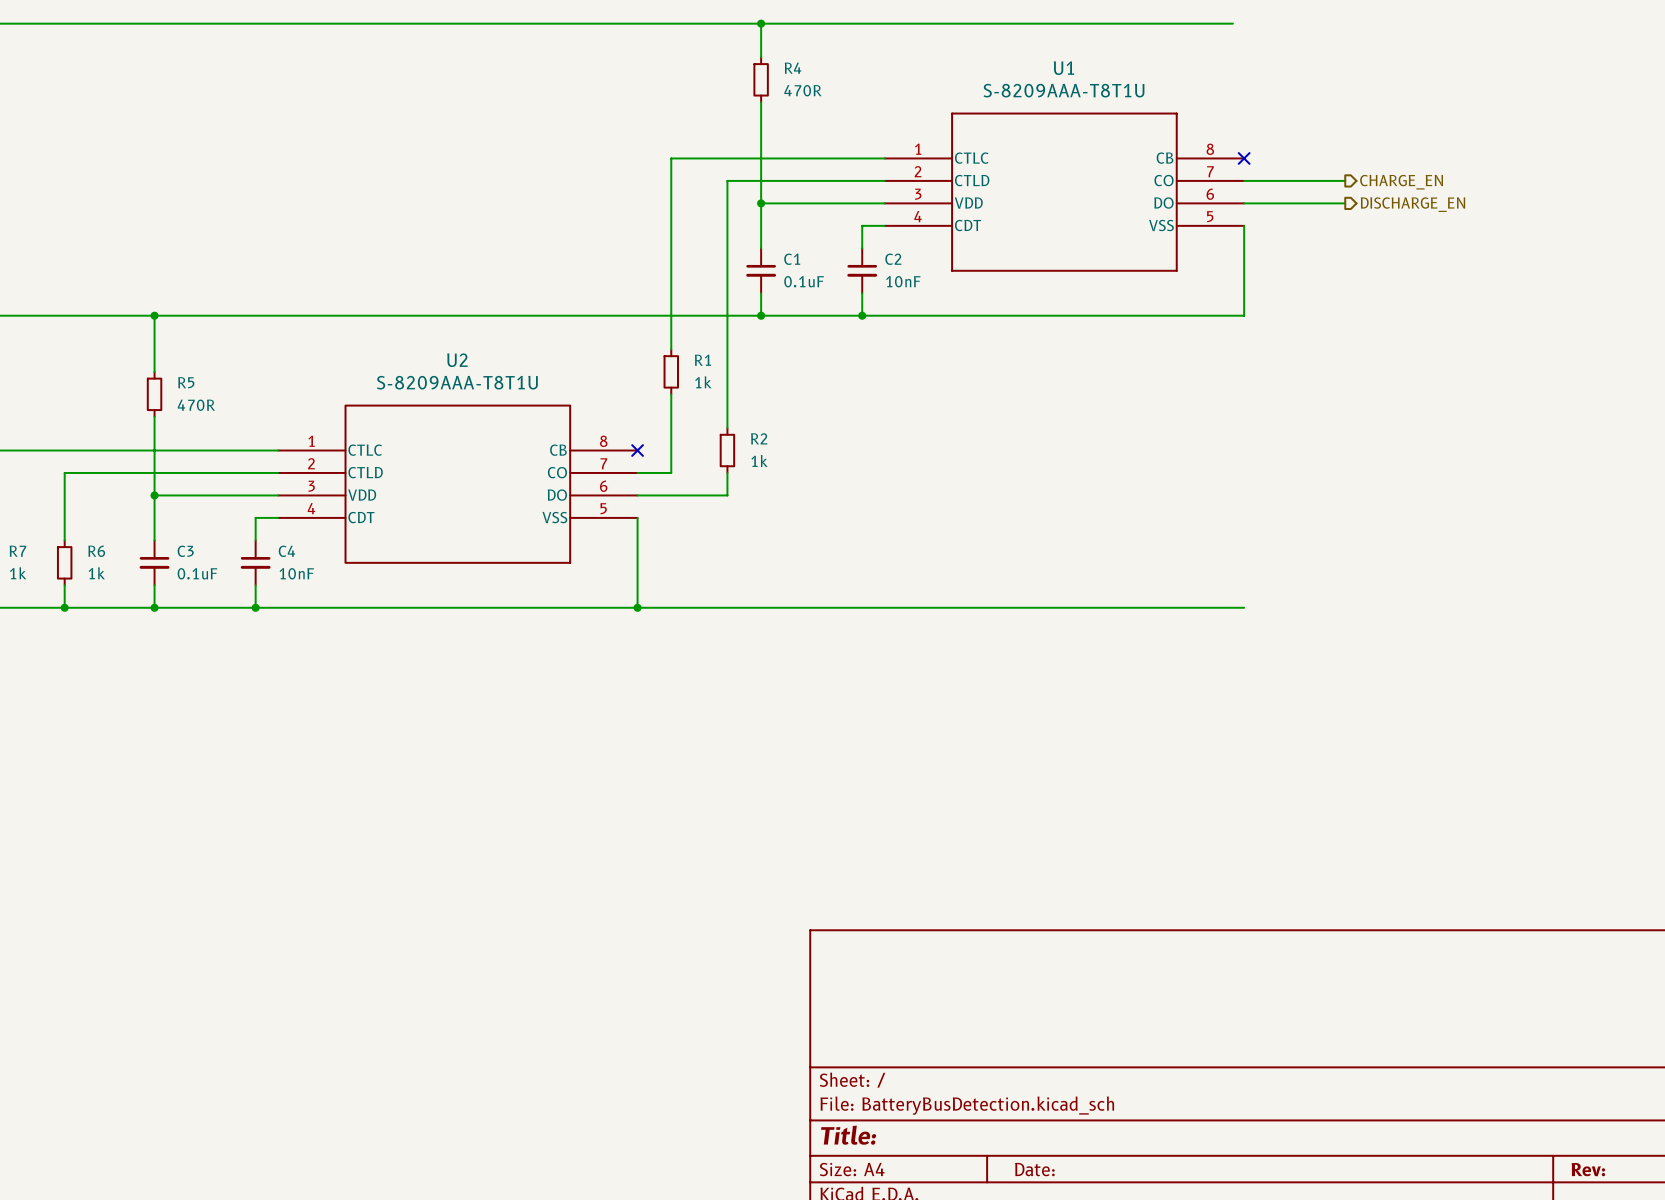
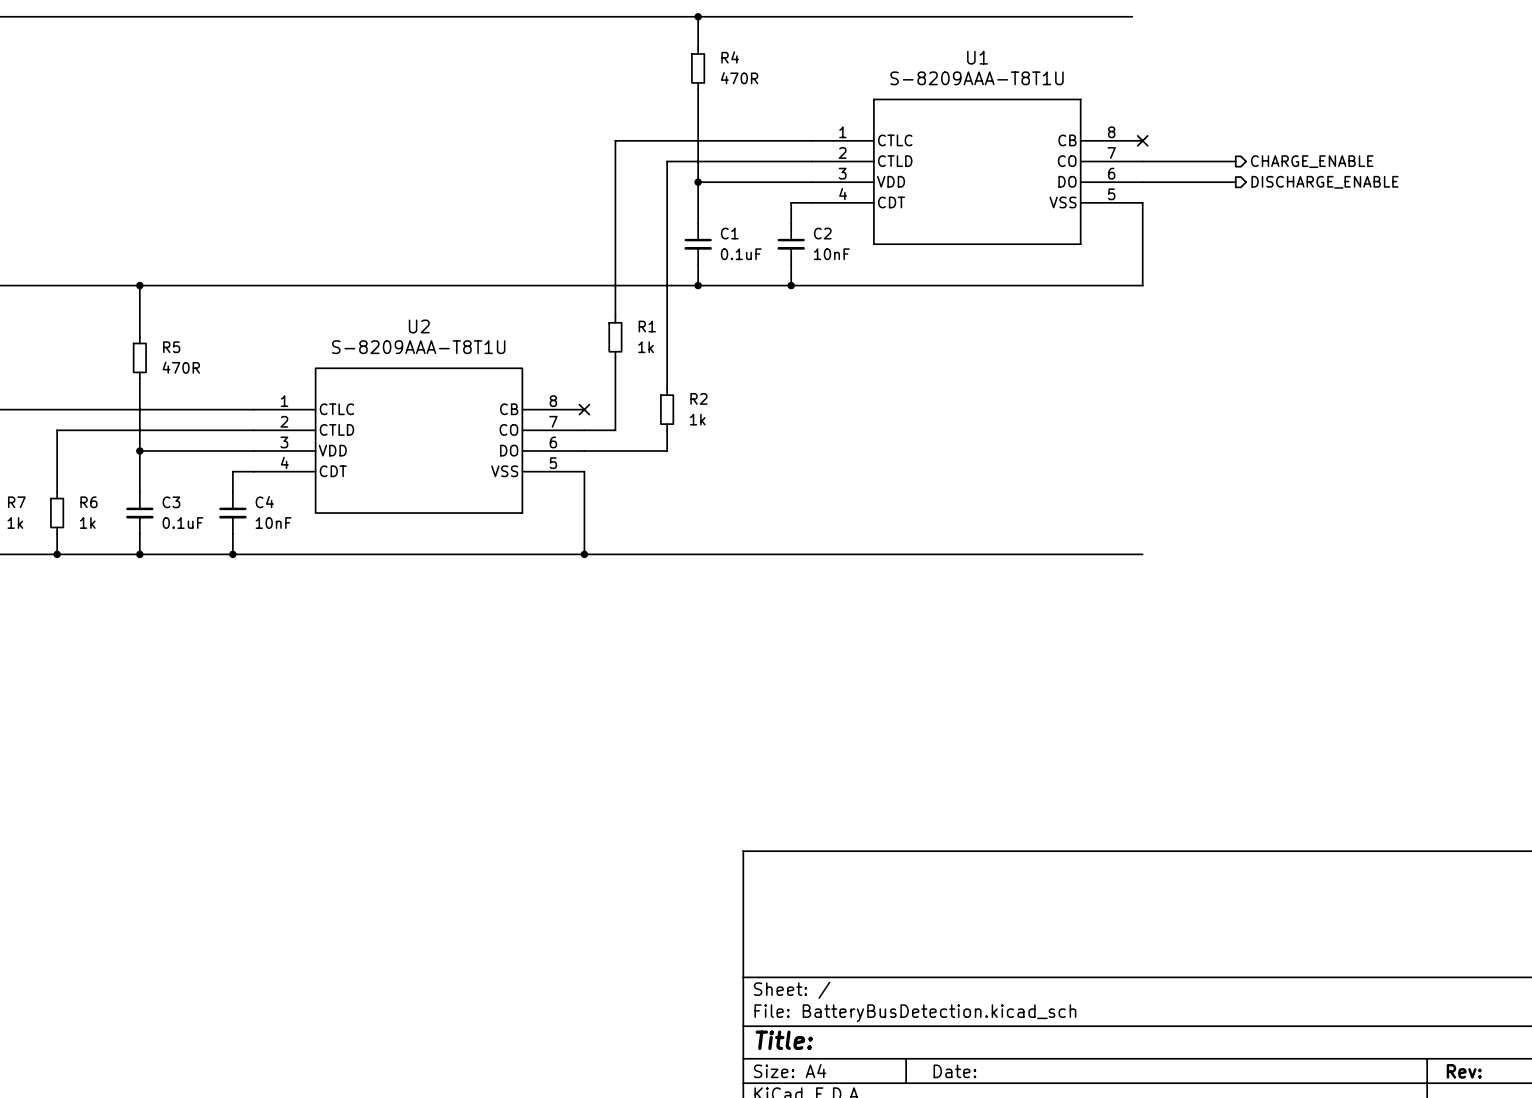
hierarchical label: CHARGE_EN (1401, 182) -> CHARGE_ENABLE (1312, 161)
hierarchical label: DISCHARGE_EN (1412, 204) -> DISCHARGE_ENABLE (1325, 182)

